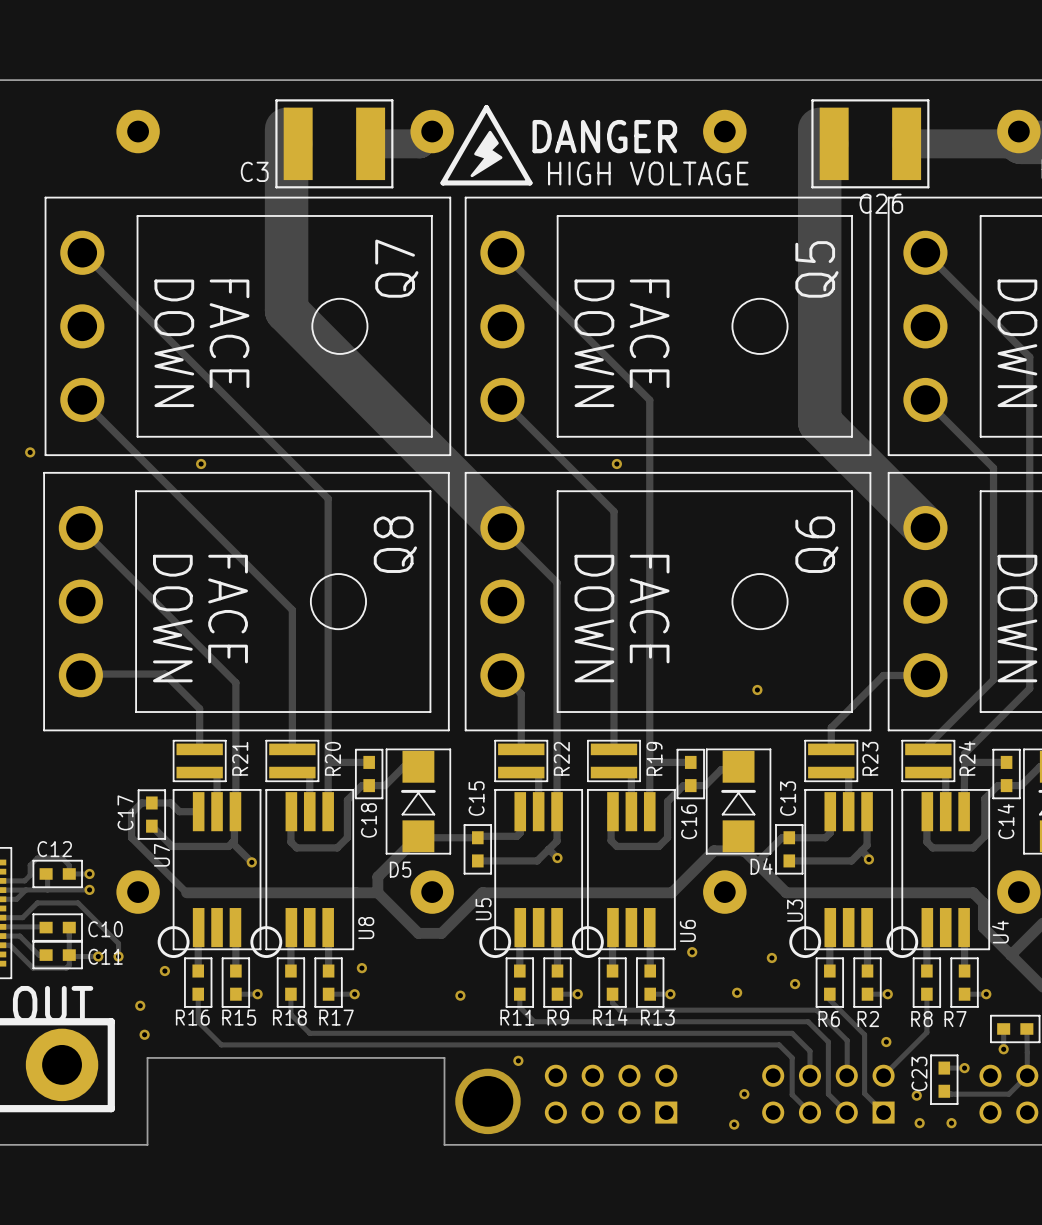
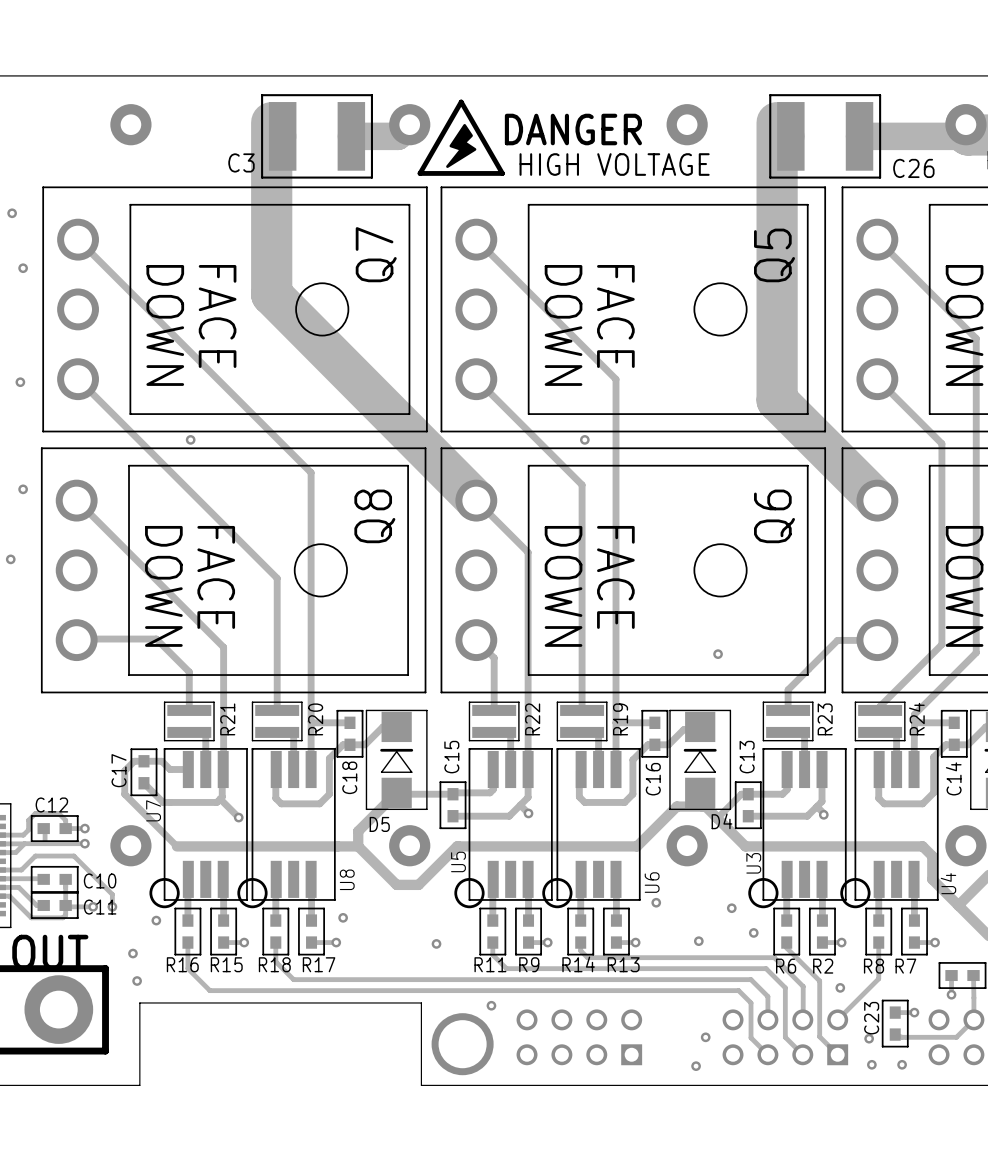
C26 name position: C26 (881, 203) -> C26 (913, 168)
via: none -> (12, 213)
via: none -> (23, 268)
via: none -> (20, 382)
via: (30, 452) -> none
via: none -> (23, 489)
via: none -> (10, 559)

